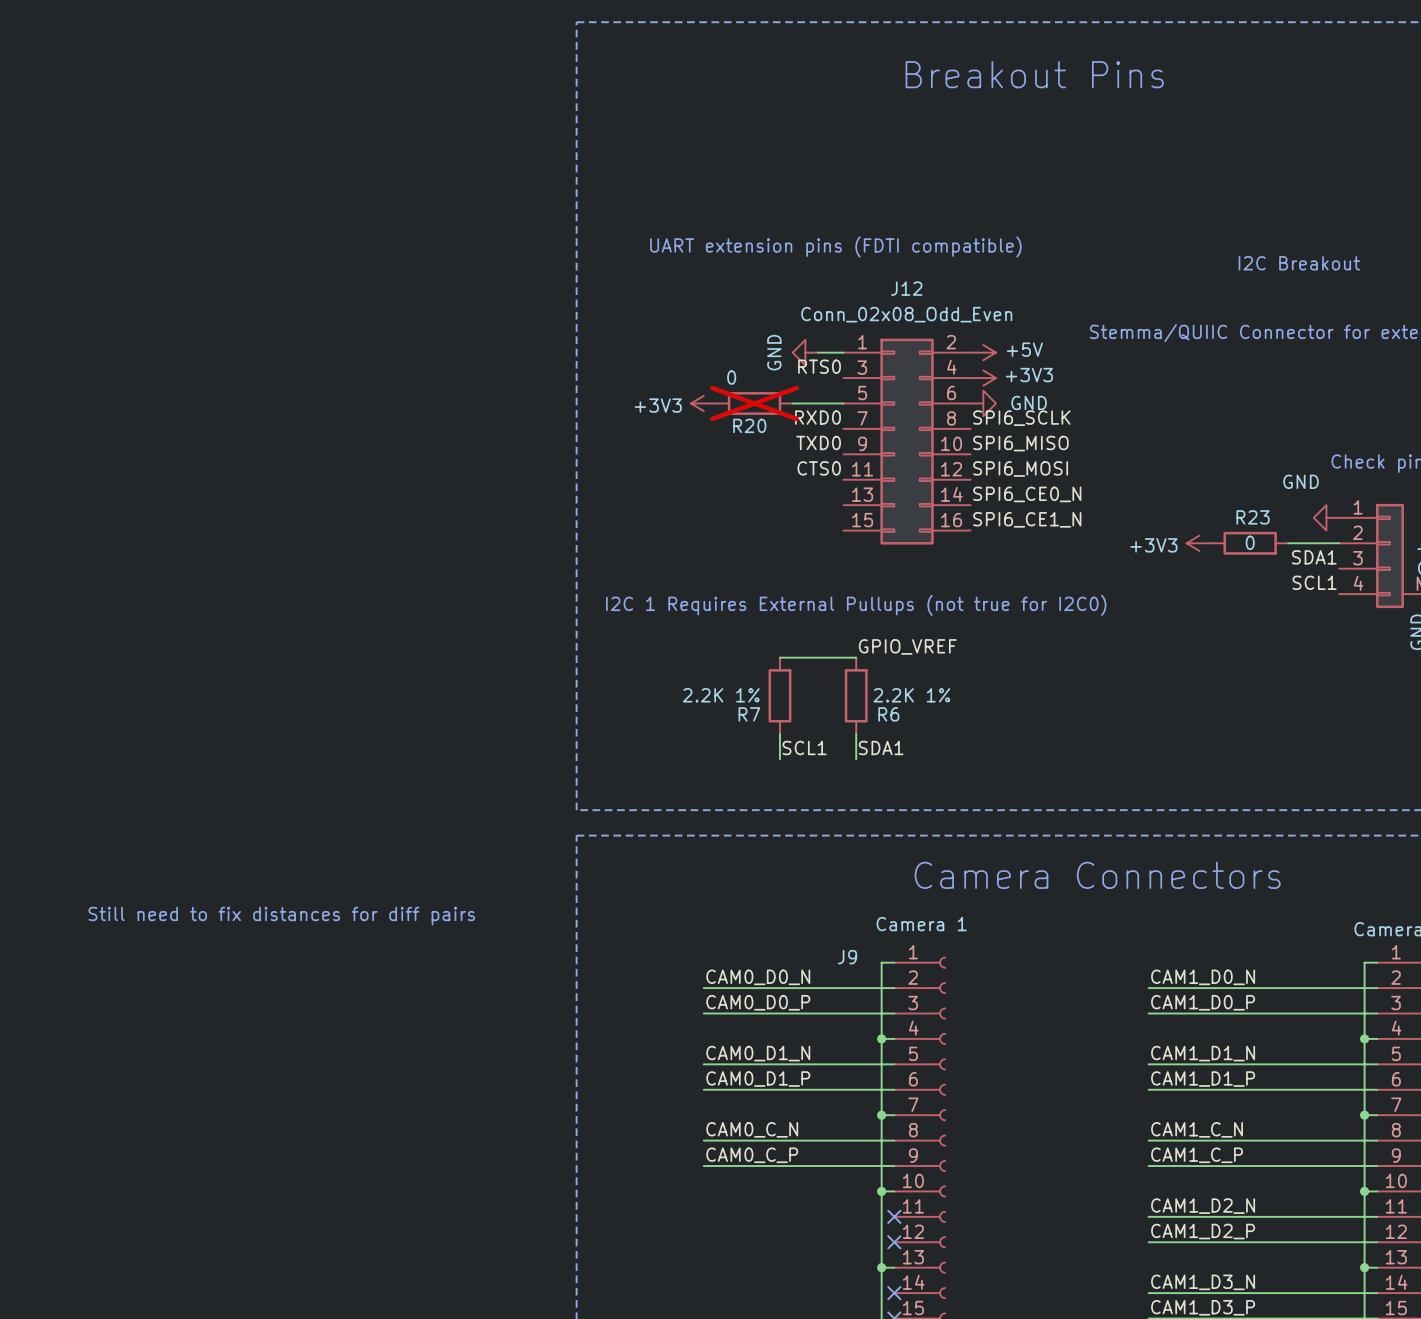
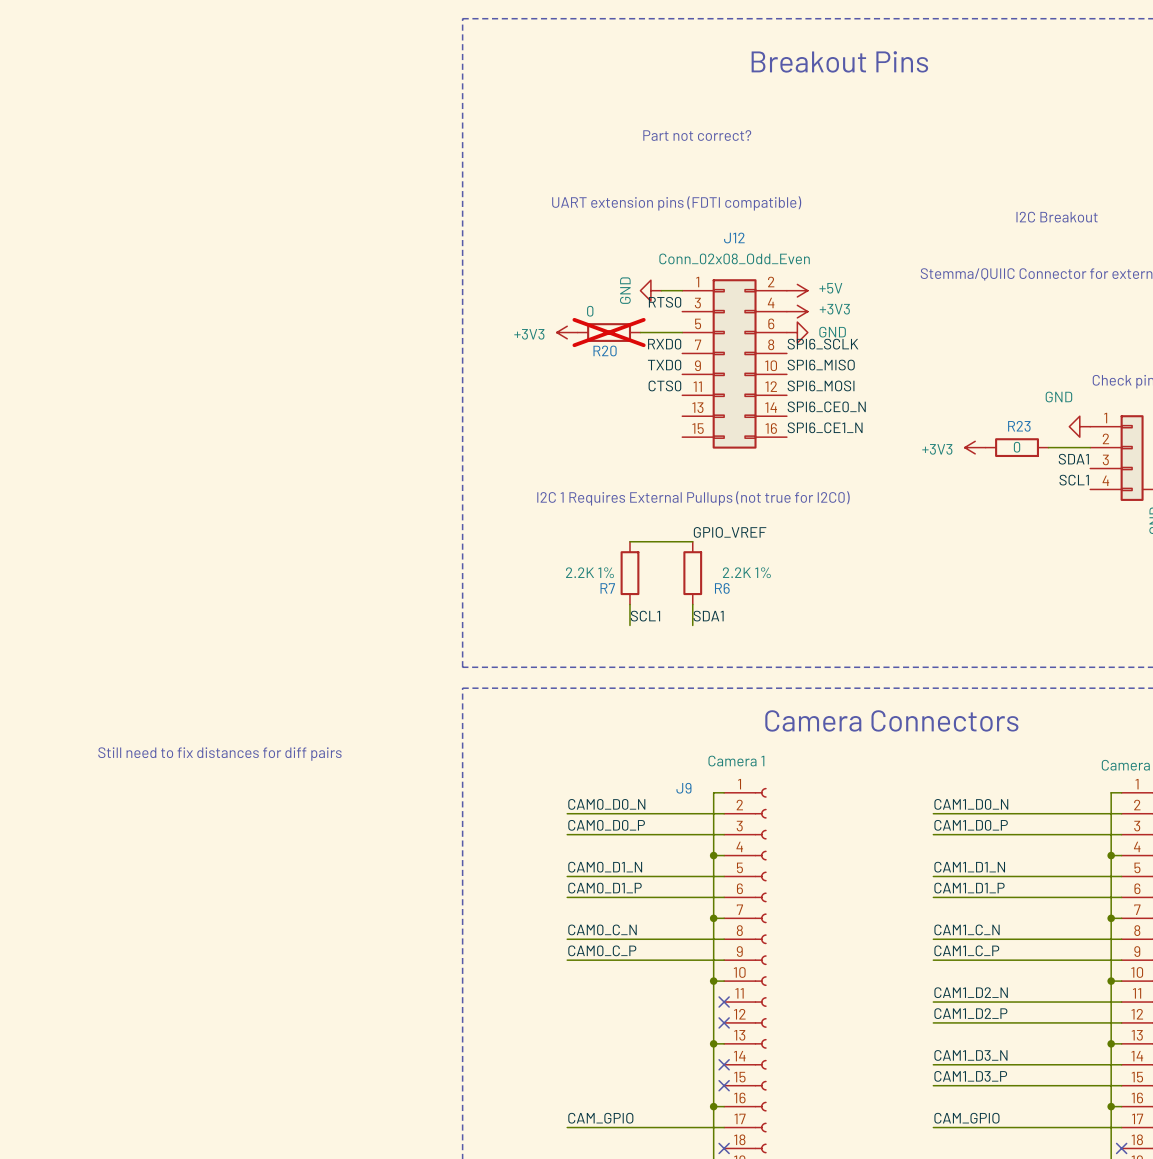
text: none -> Part not correct? (697, 135)

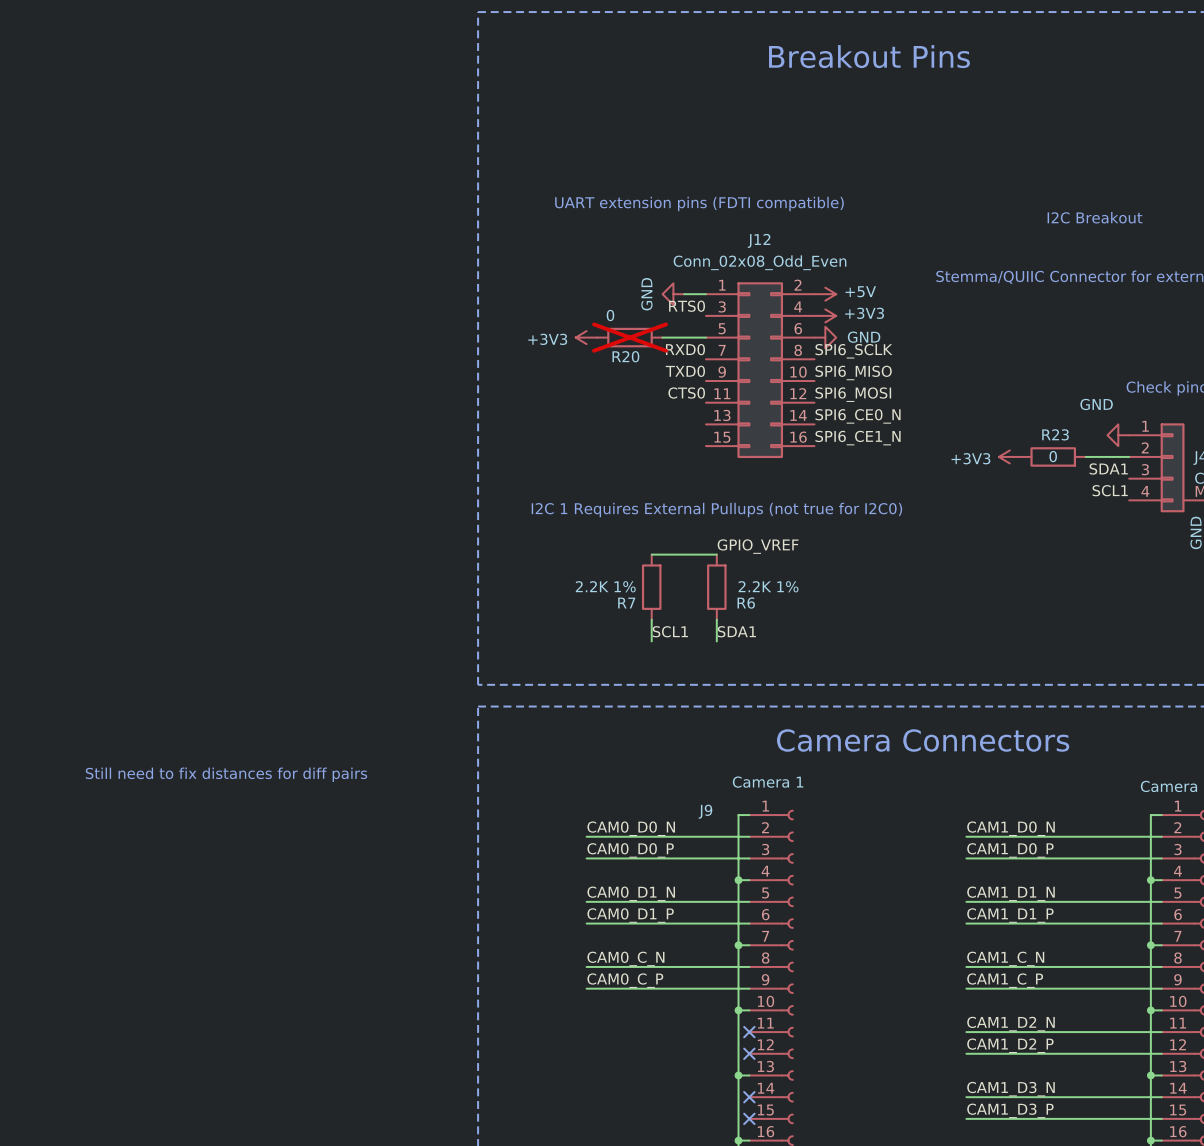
text: Part not correct? (697, 135) -> none

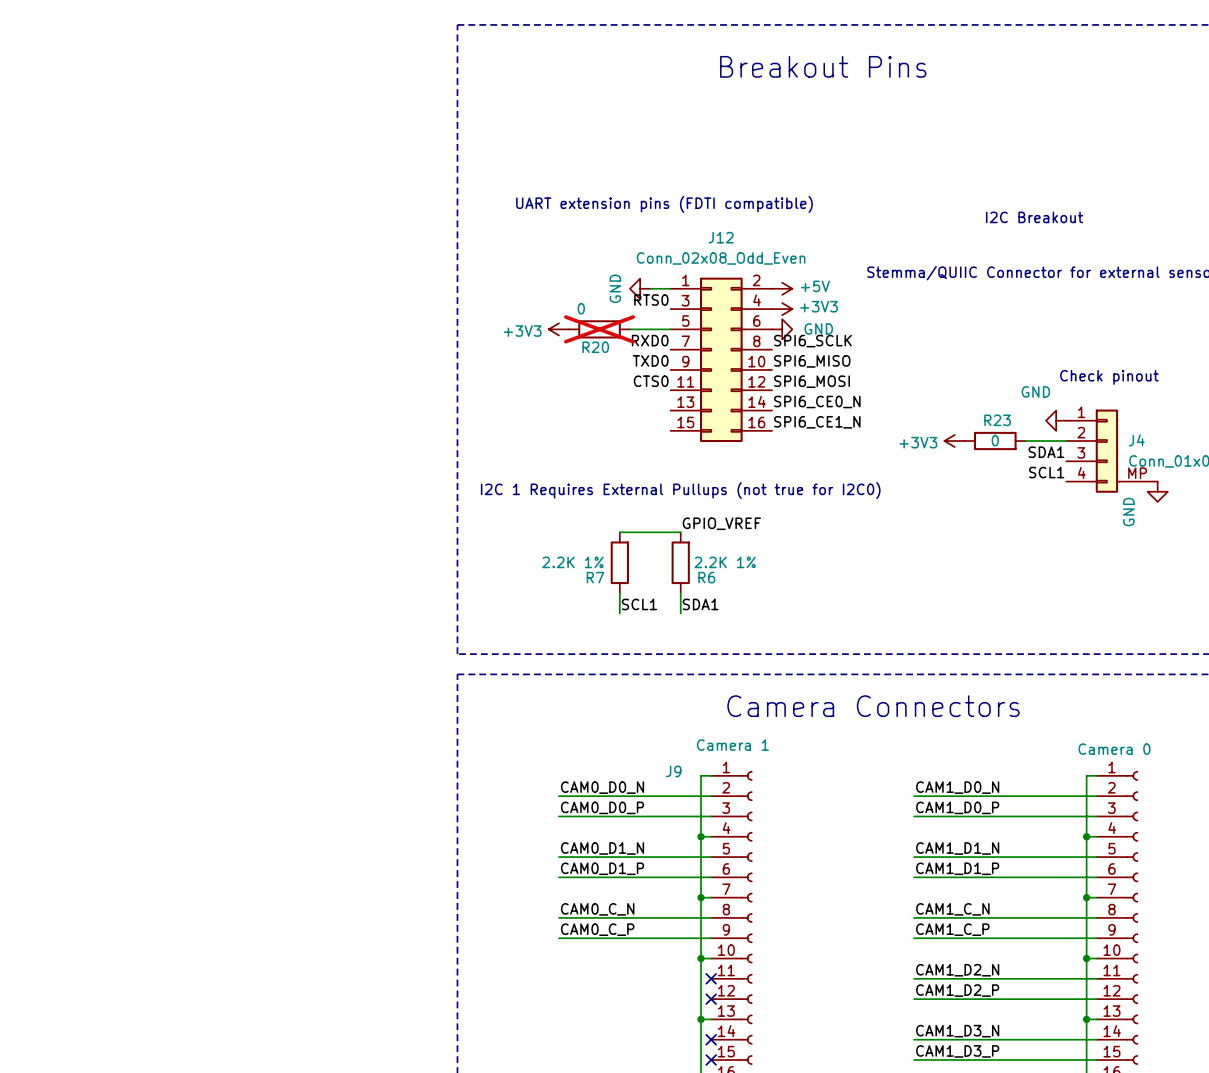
text: Still need to fix distances for diff pairs (226, 774) -> none

